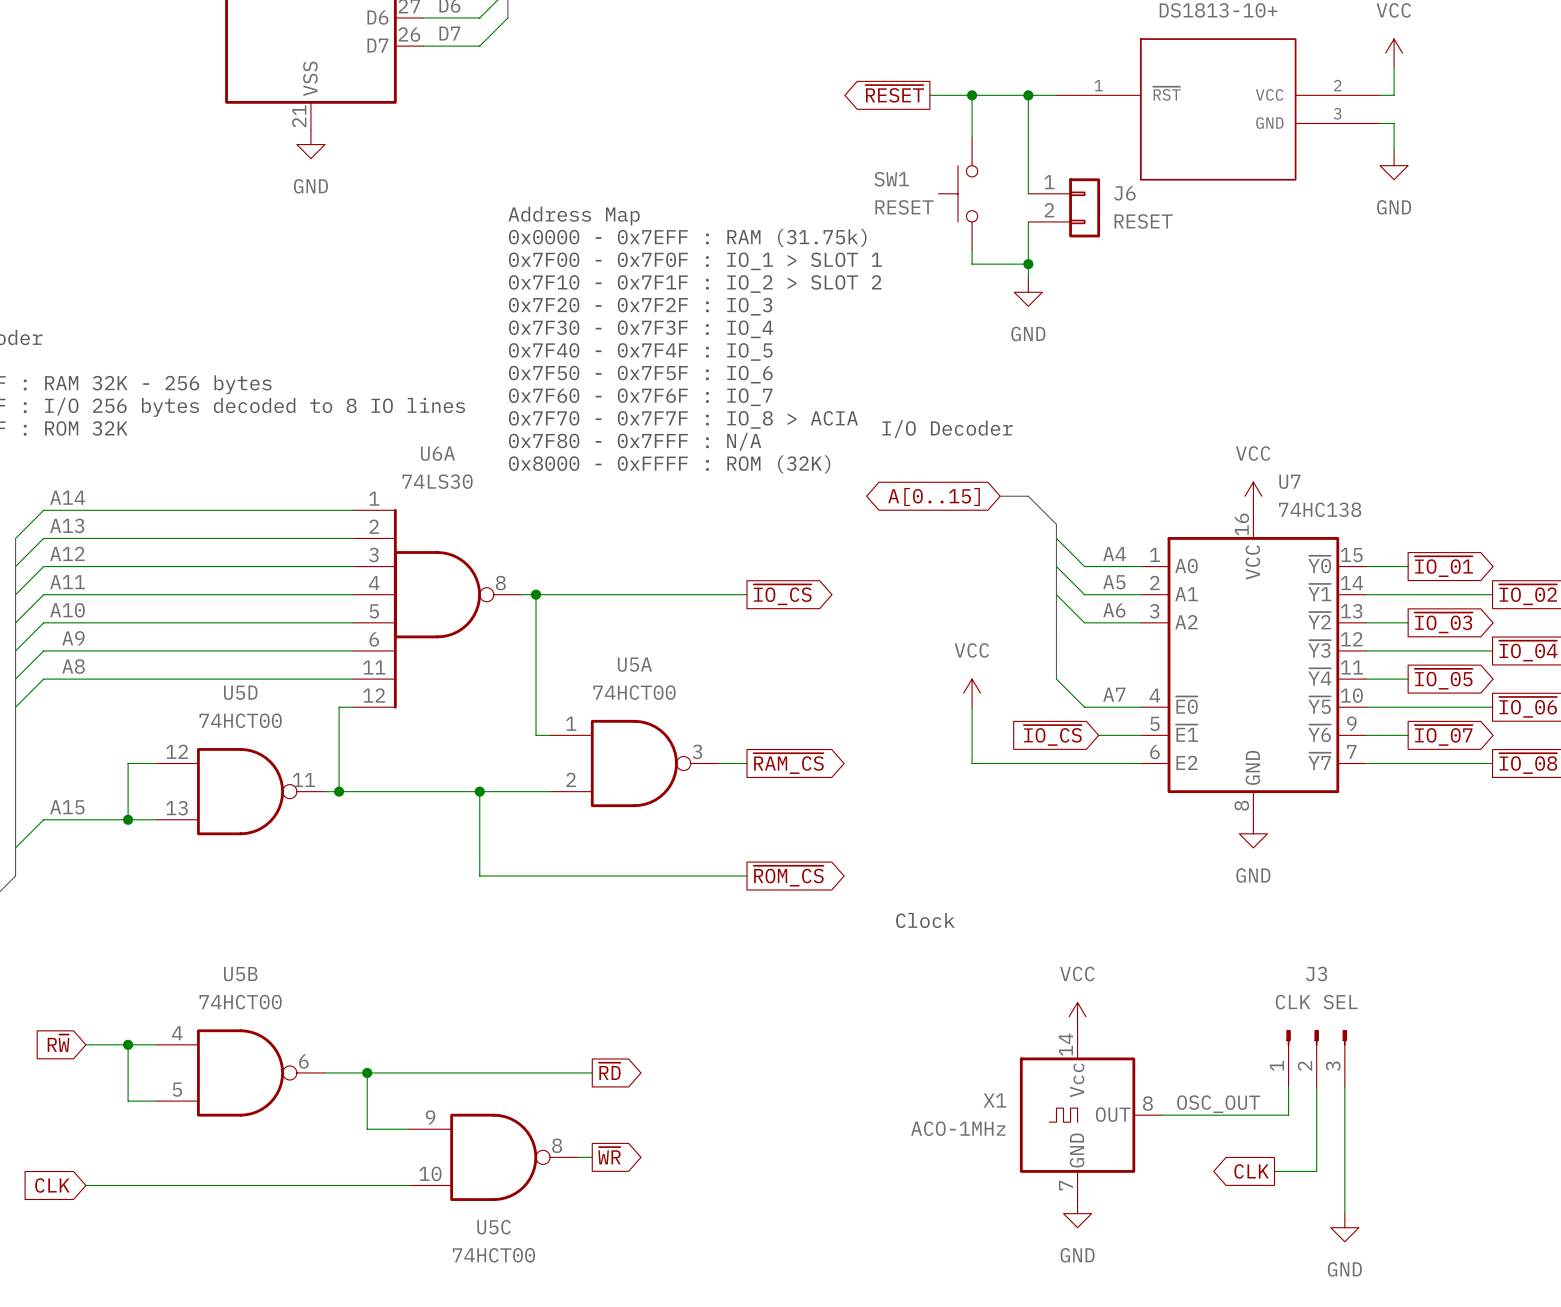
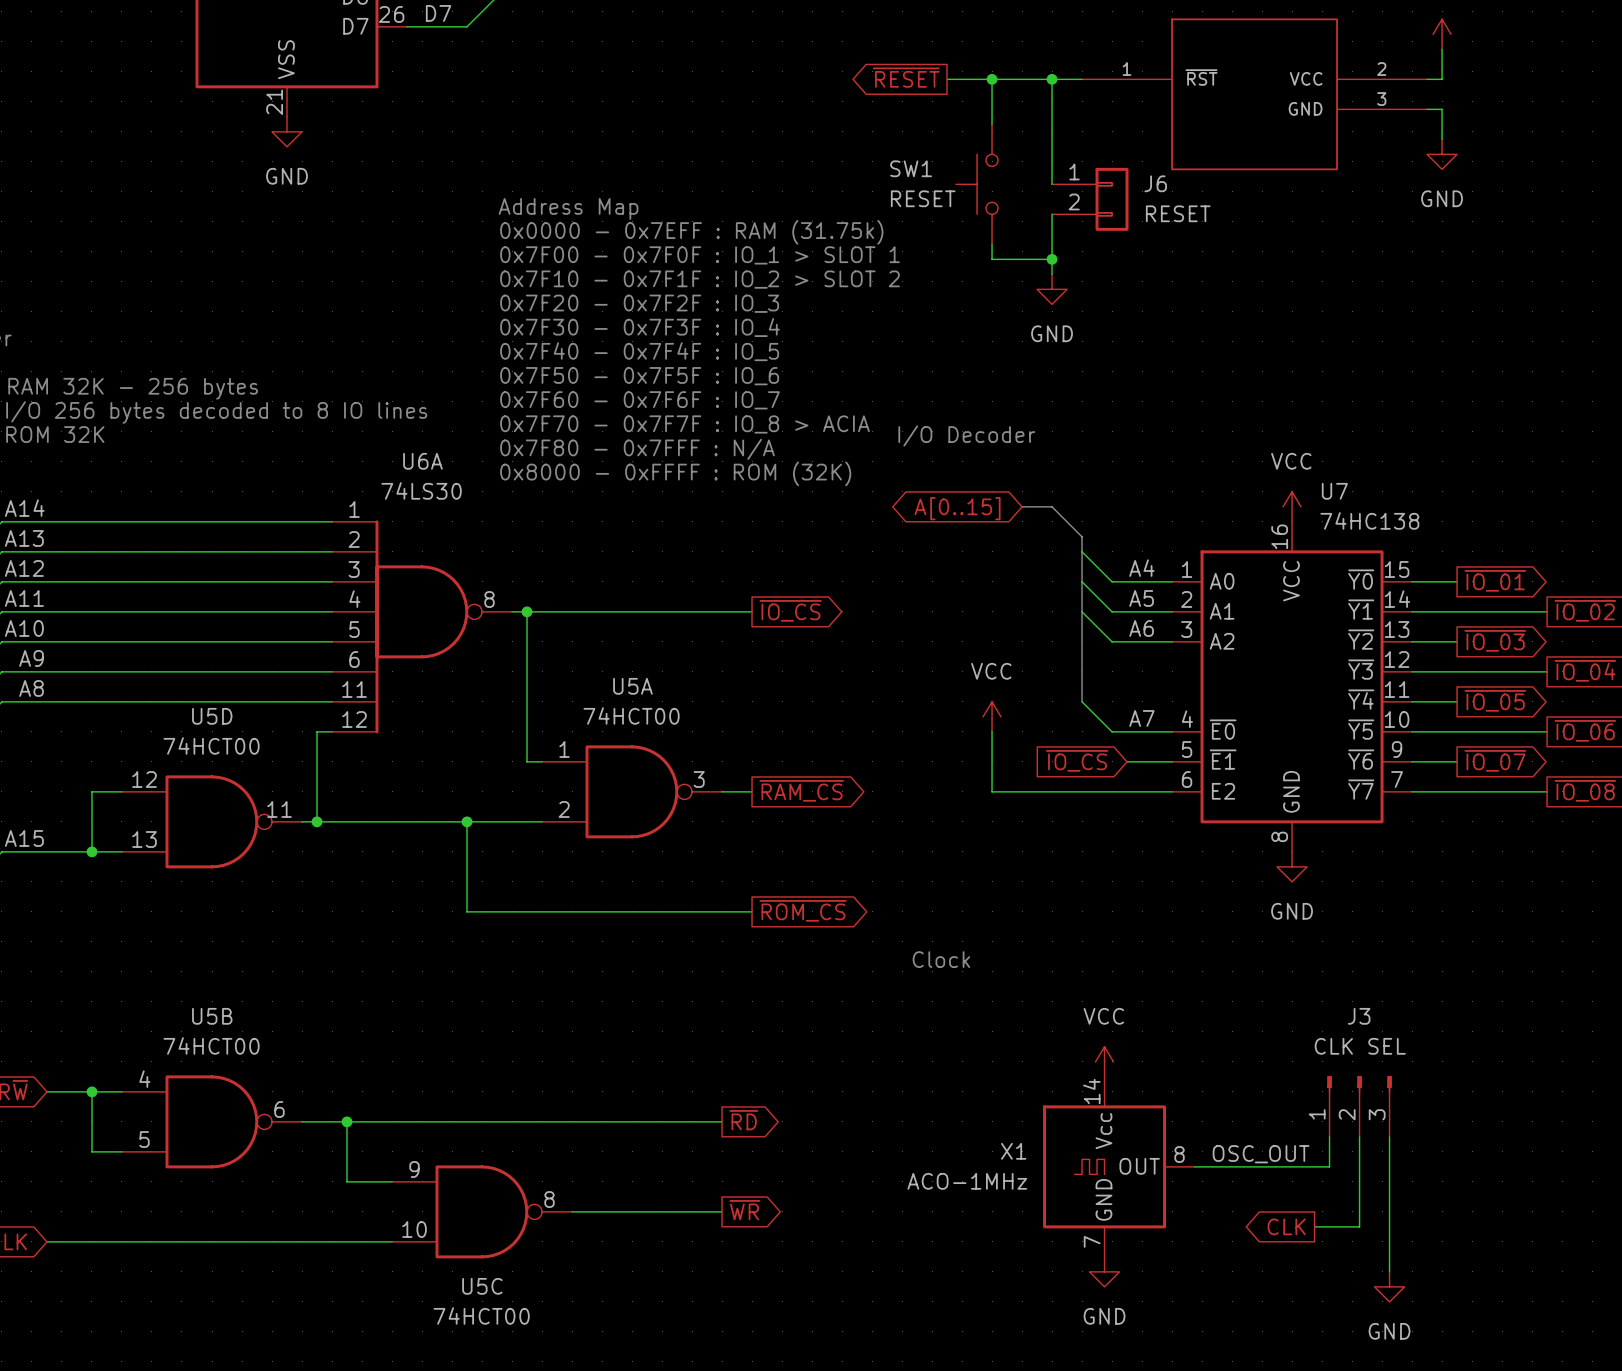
global label position: ~{RD} (609, 1071) -> ~{RD} (743, 1120)
wire: none -> (587, 1121) (722, 1121)
global label position: ~{WR} (609, 1155) -> ~{WR} (744, 1210)
wire: none -> (587, 1211) (722, 1211)

